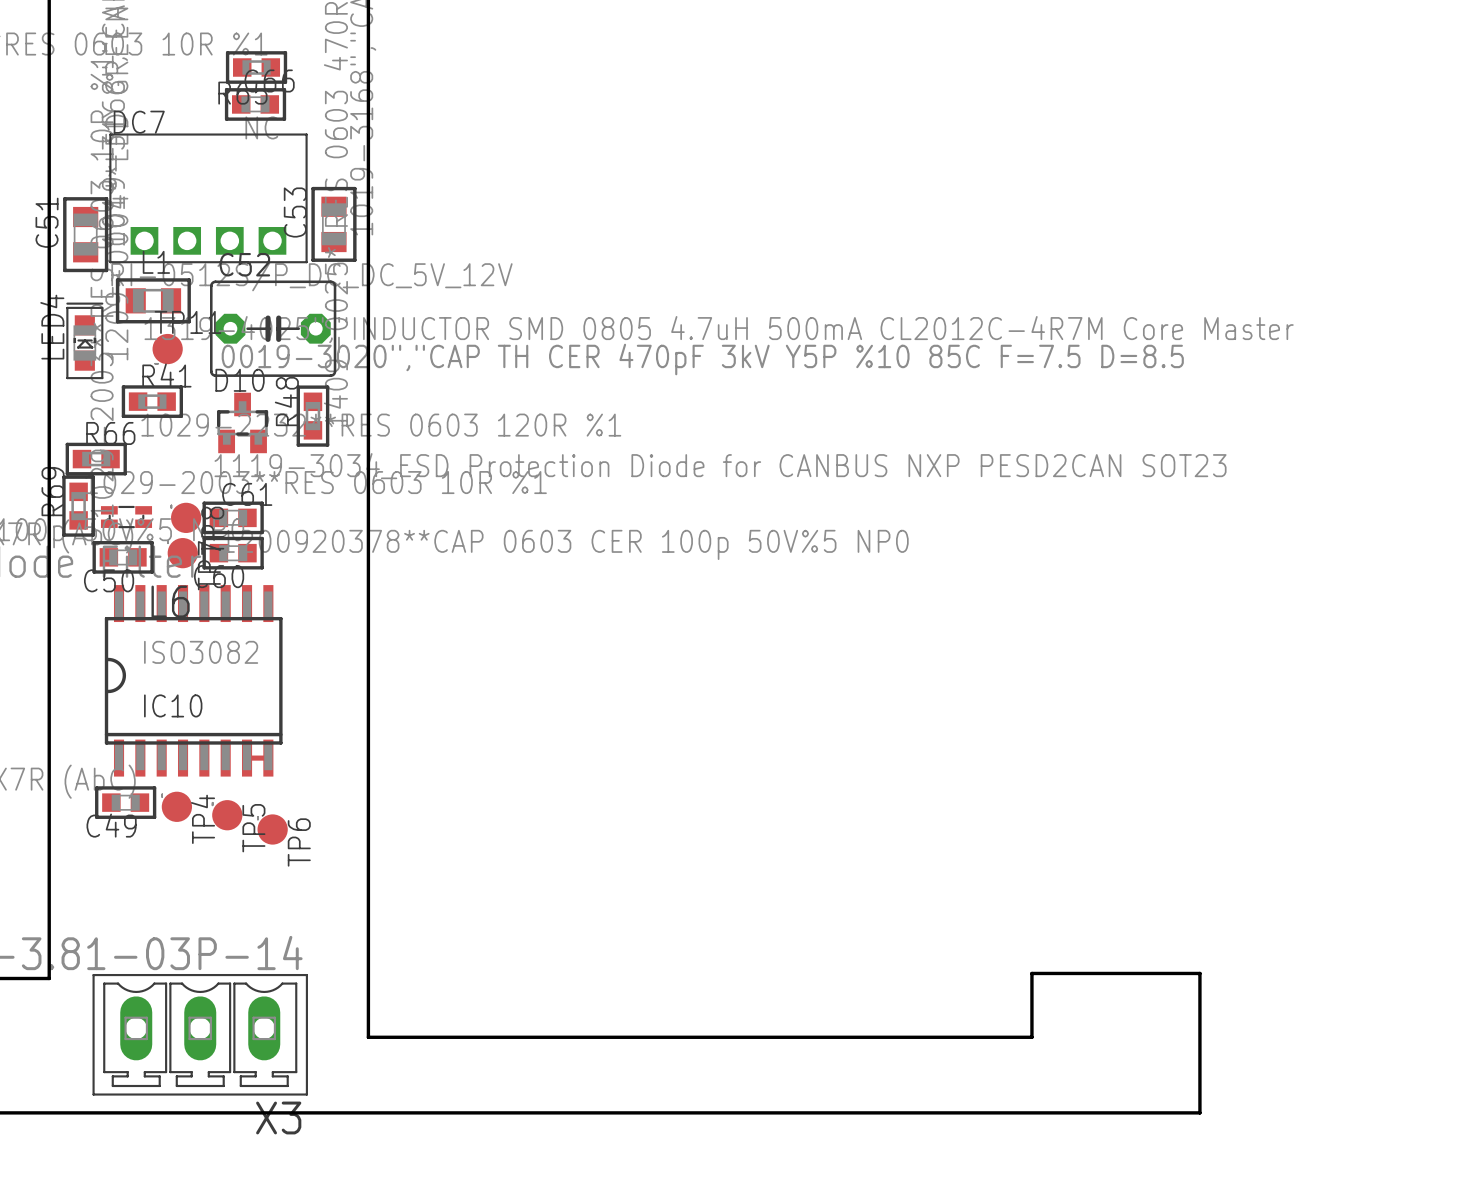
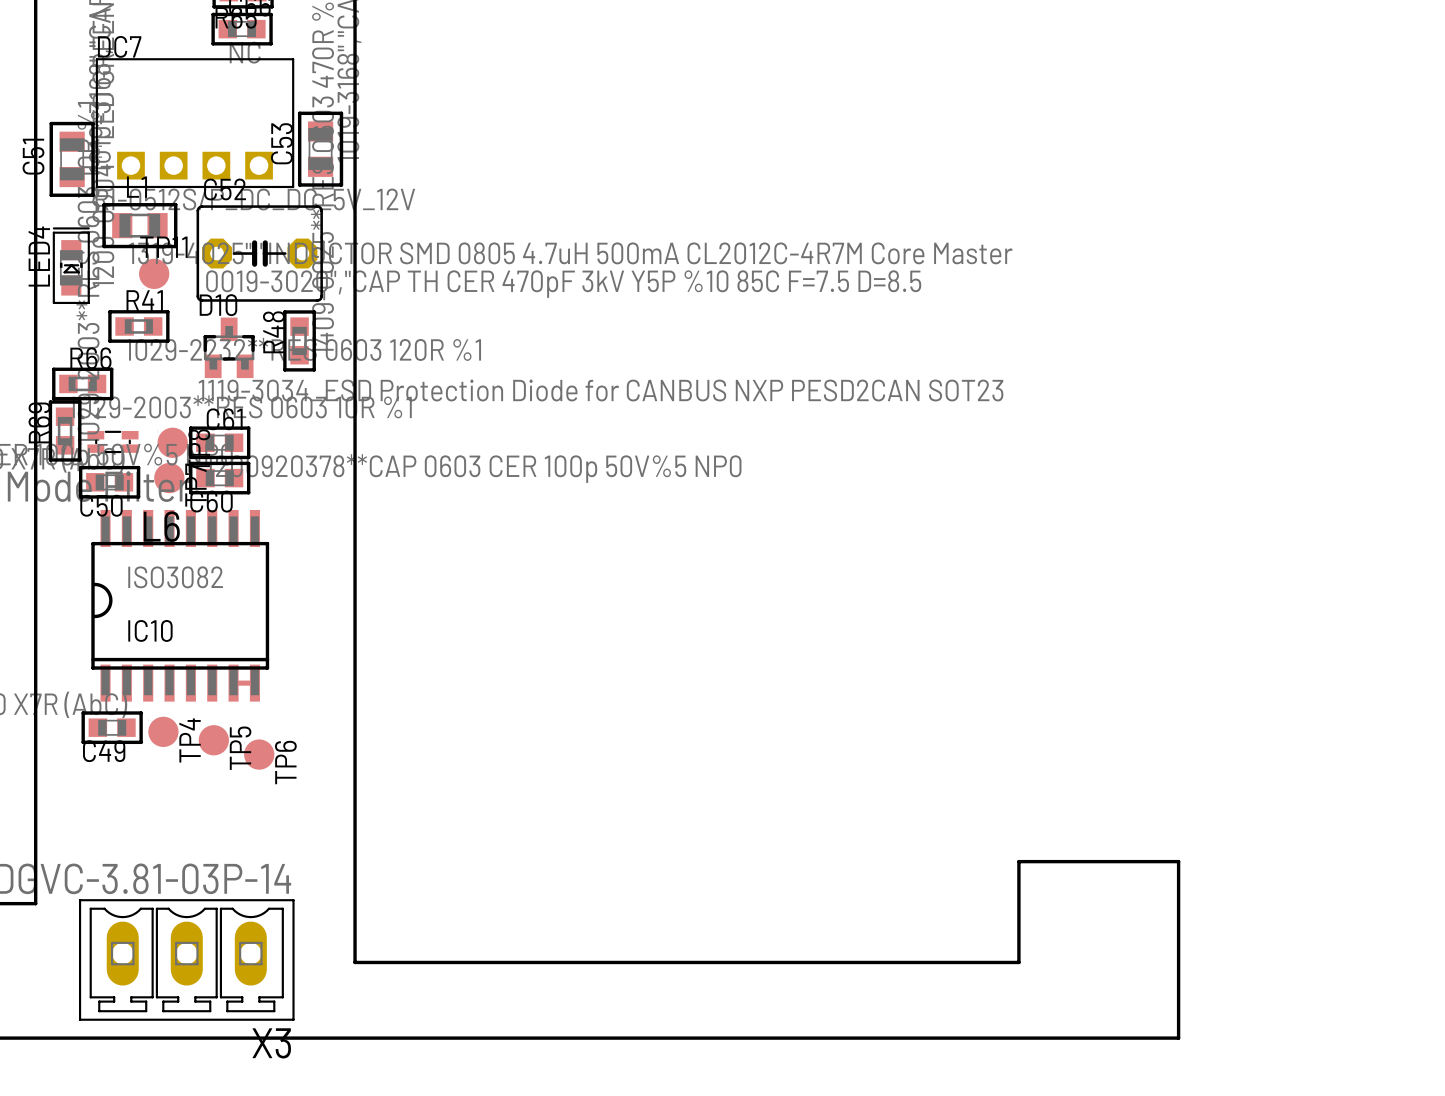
board edge: (1031, 973) (1199, 973) (1199, 1112) (1191, 1112) -> (1018, 898) (1018, 861) (1178, 861) (1178, 1038)

